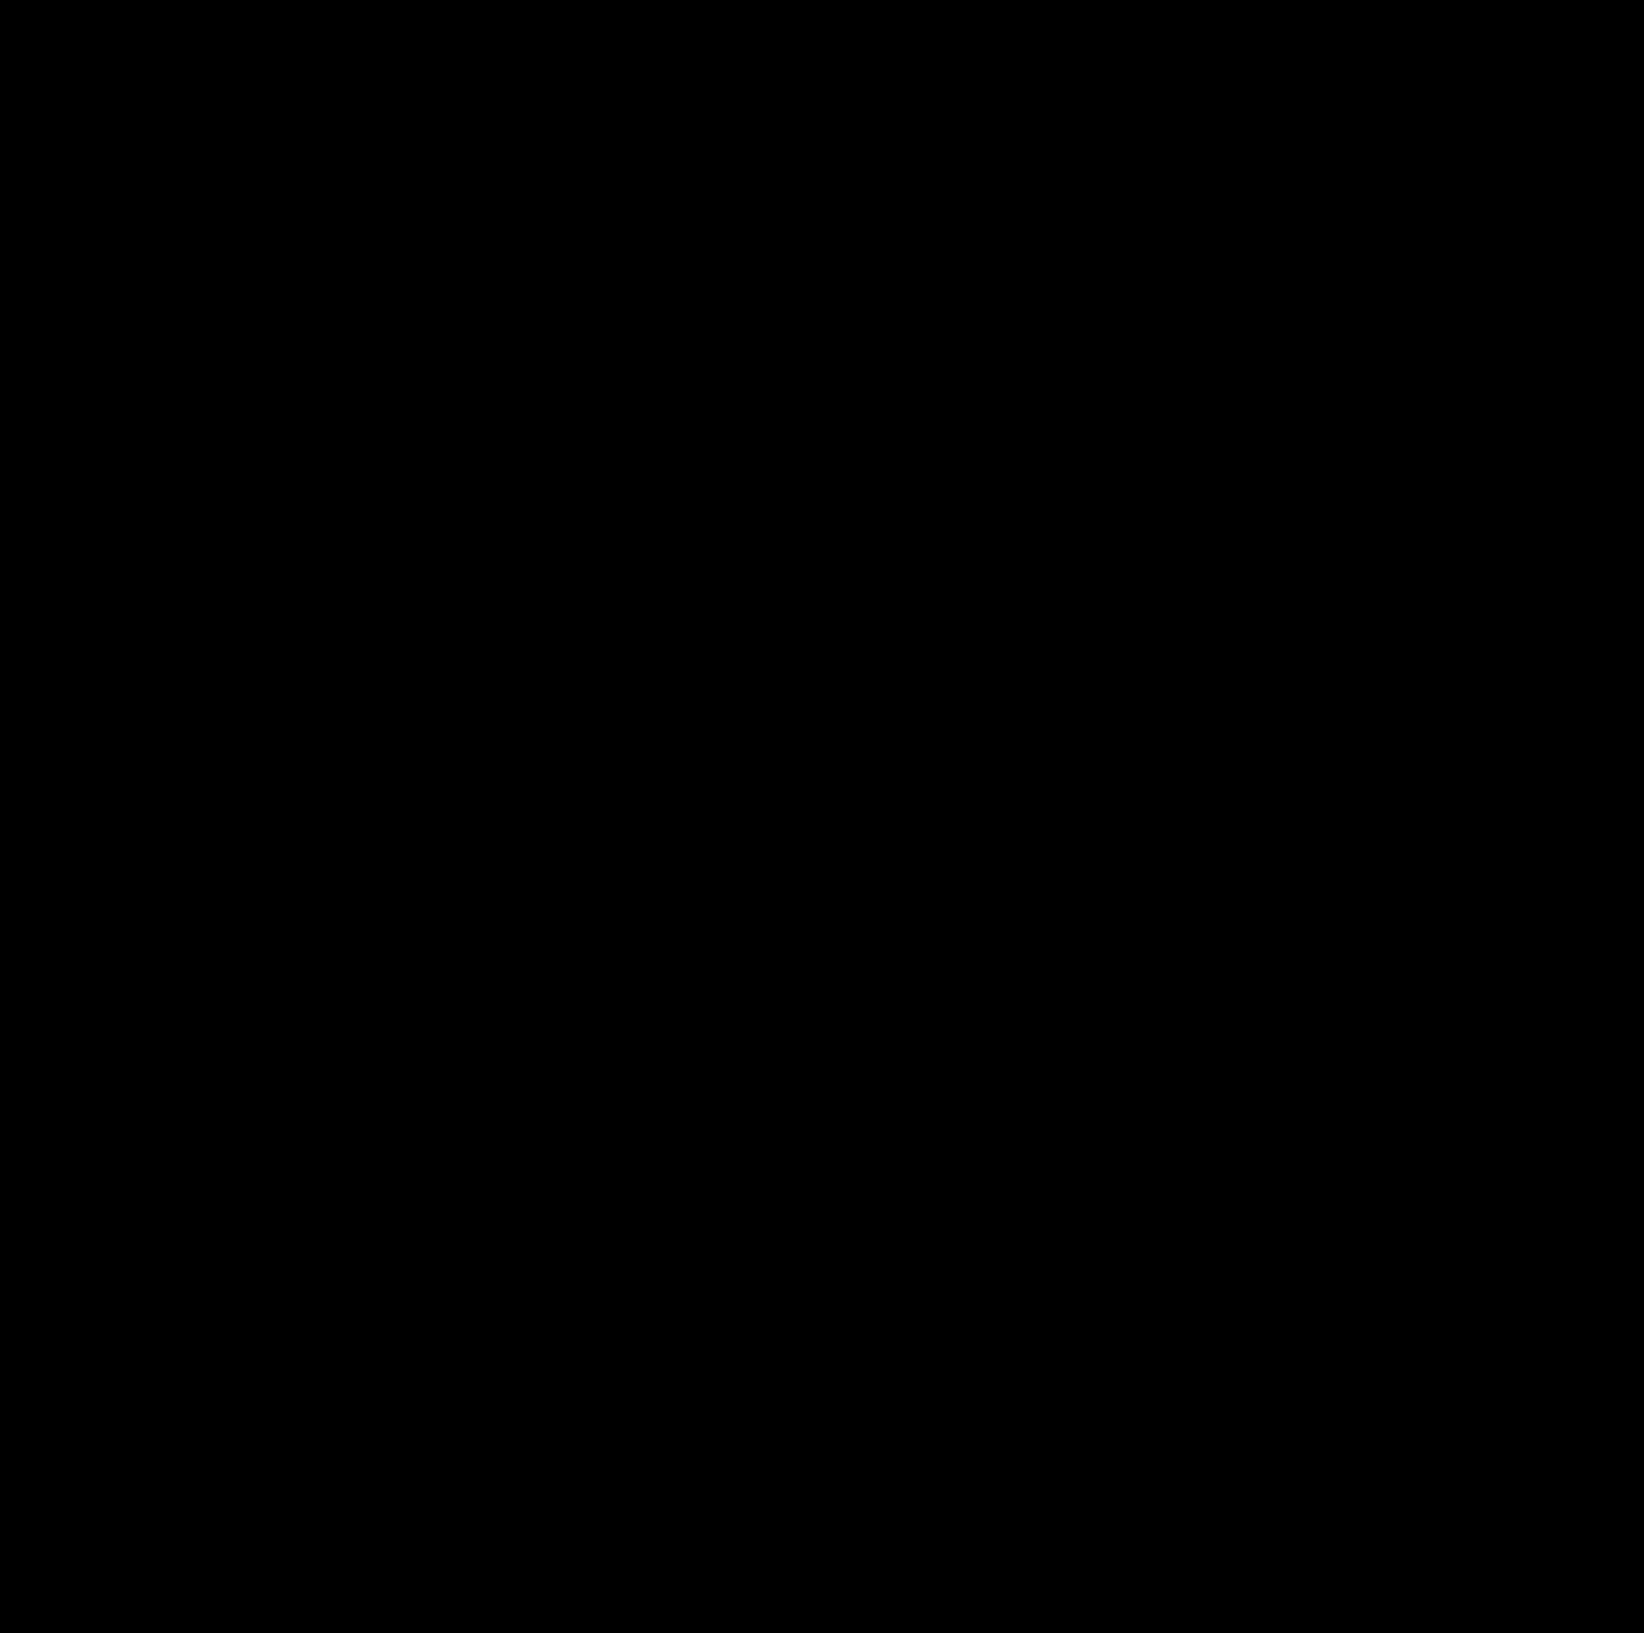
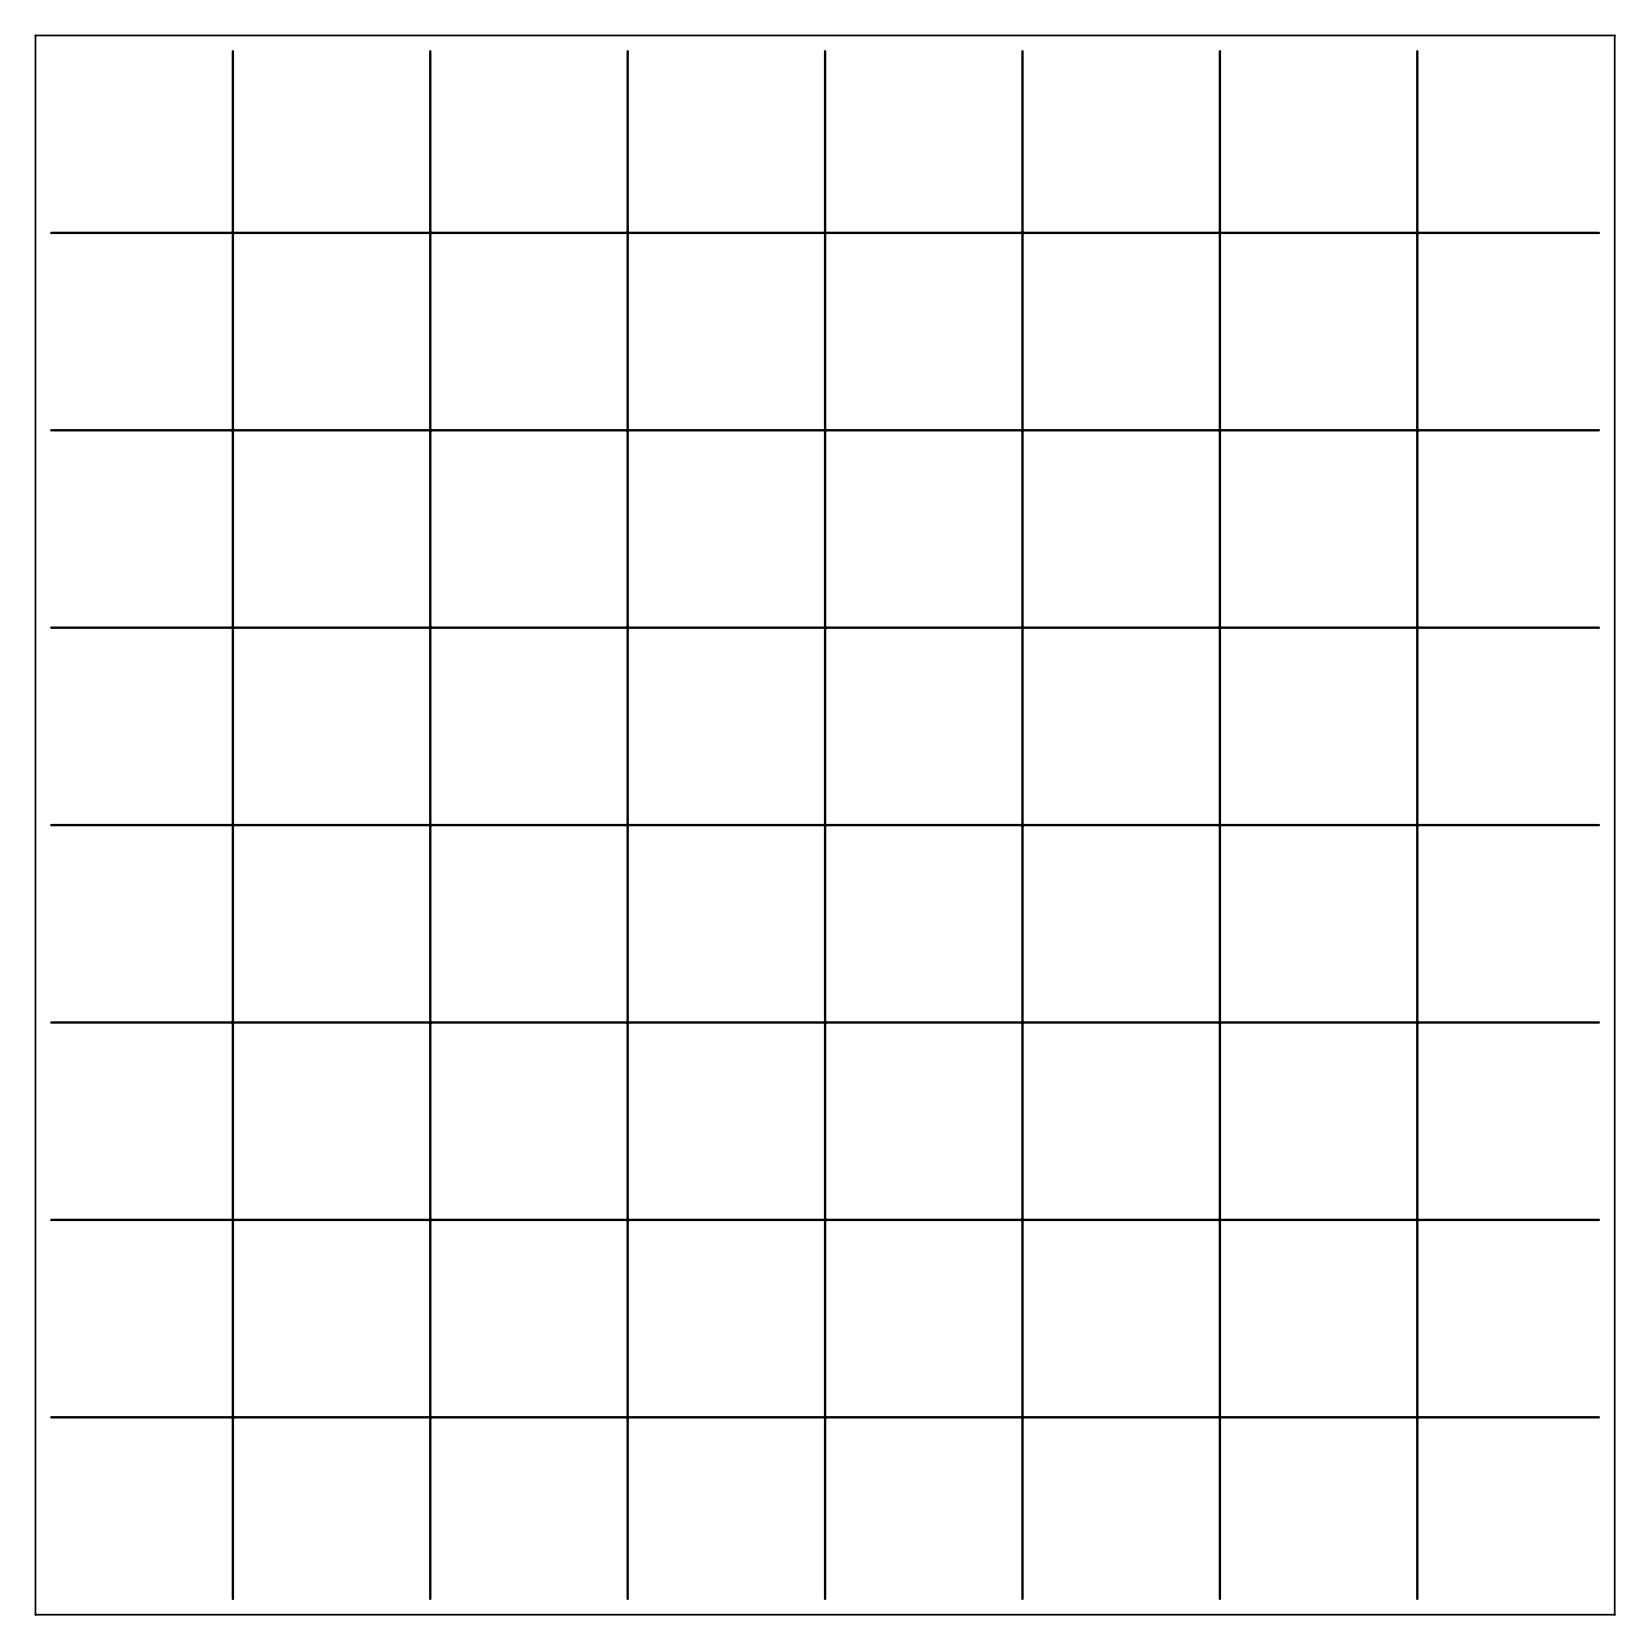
board edge: none -> (35, 35) (1614, 35) (1614, 1614) (35, 1614) (35, 35)
line: none -> (232, 51) (232, 1598)
line: none -> (430, 51) (430, 1598)
line: none -> (627, 51) (627, 1598)
line: none -> (825, 51) (825, 1598)
line: none -> (1022, 51) (1022, 1598)
line: none -> (1219, 51) (1219, 1598)
line: none -> (1417, 51) (1417, 1598)
line: none -> (51, 232) (1598, 232)
line: none -> (51, 430) (1598, 430)
line: none -> (51, 627) (1598, 627)
line: none -> (51, 825) (1598, 825)
line: none -> (51, 1022) (1598, 1022)
line: none -> (51, 1219) (1598, 1219)
line: none -> (51, 1417) (1598, 1417)

